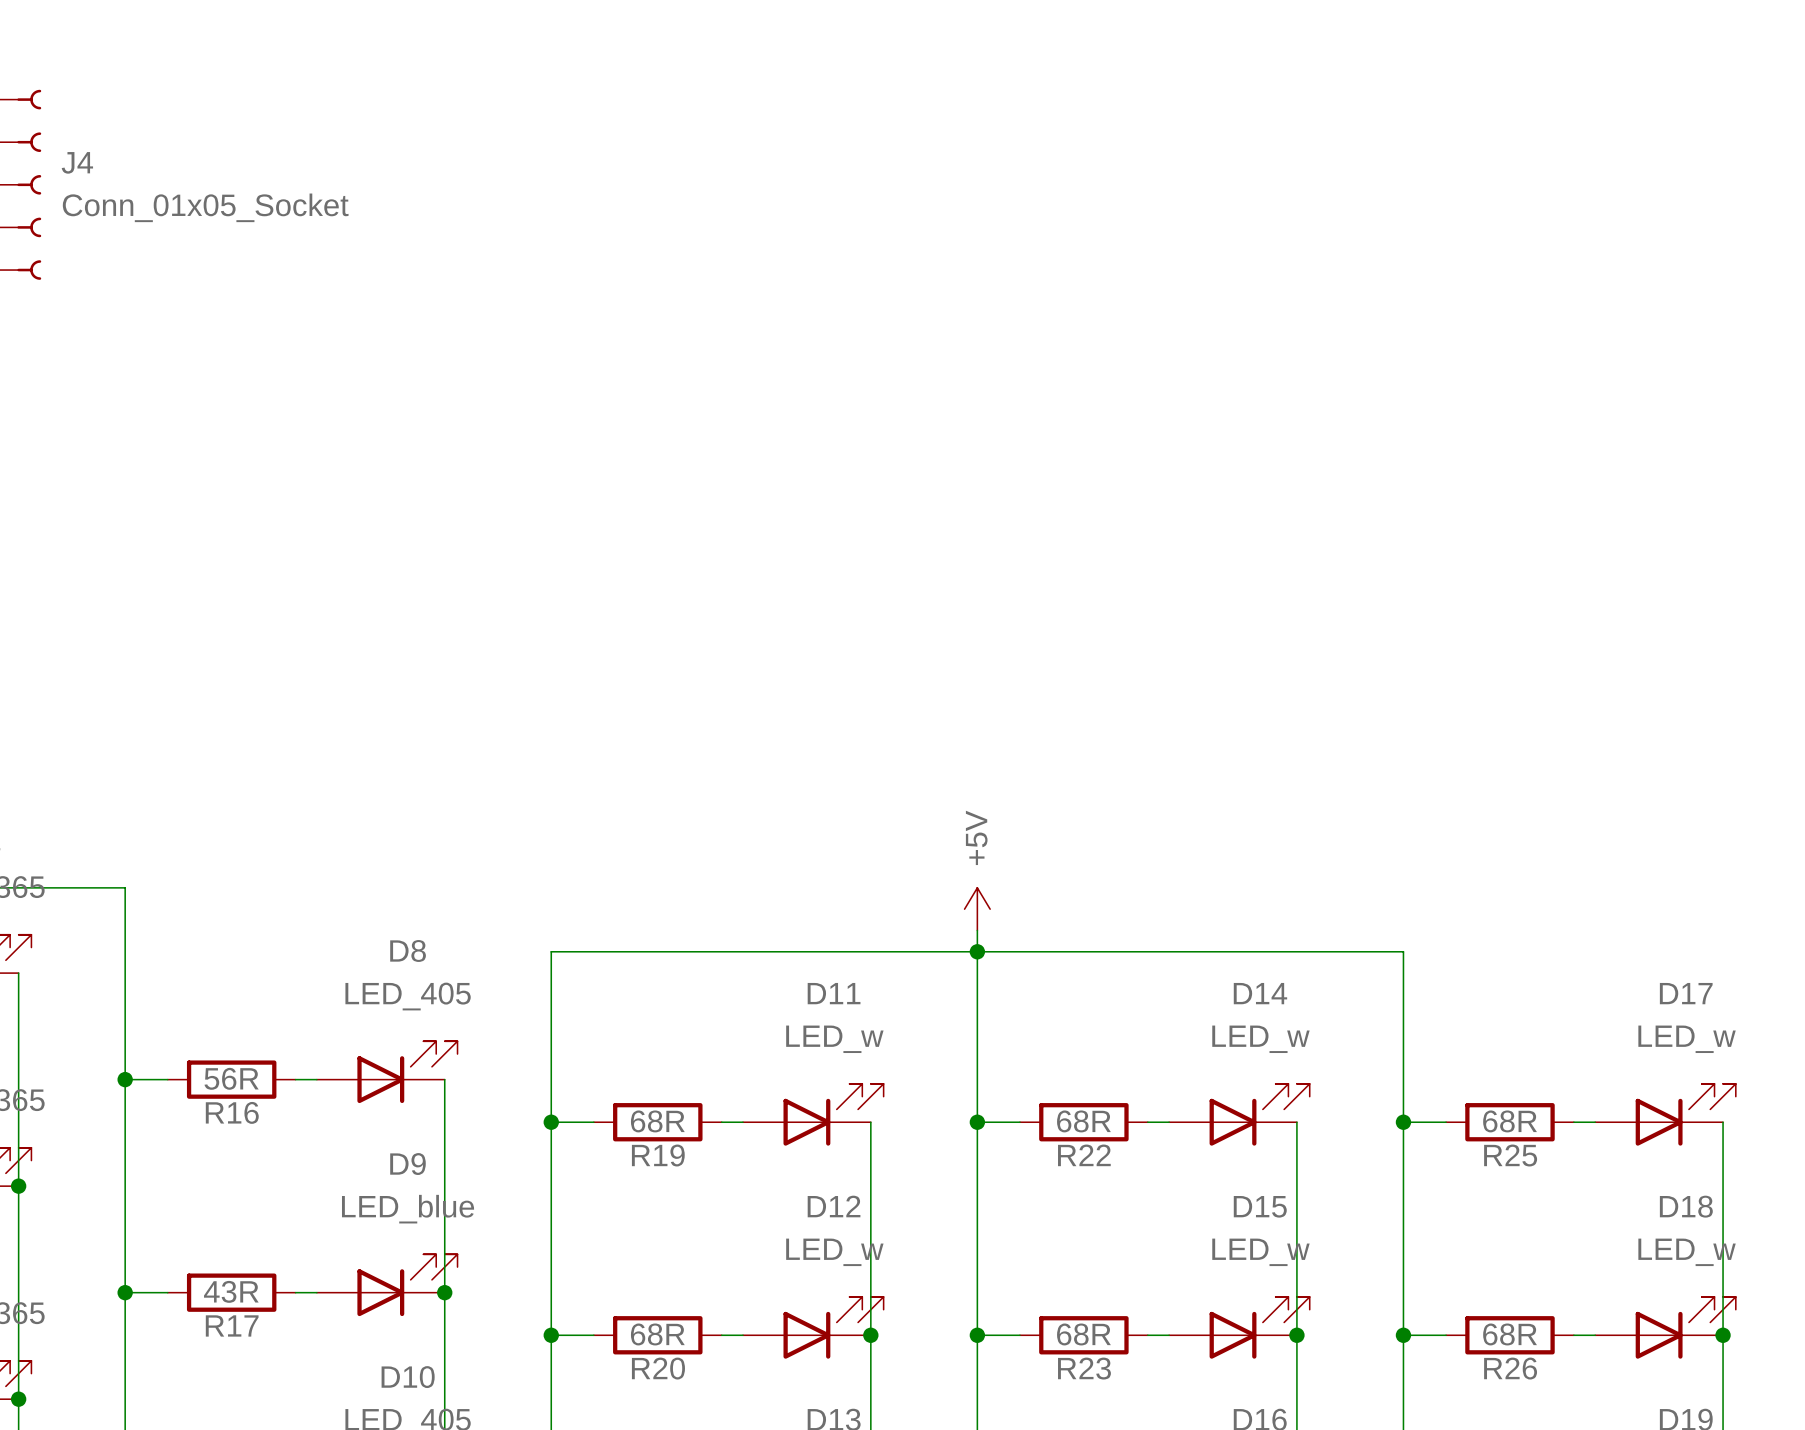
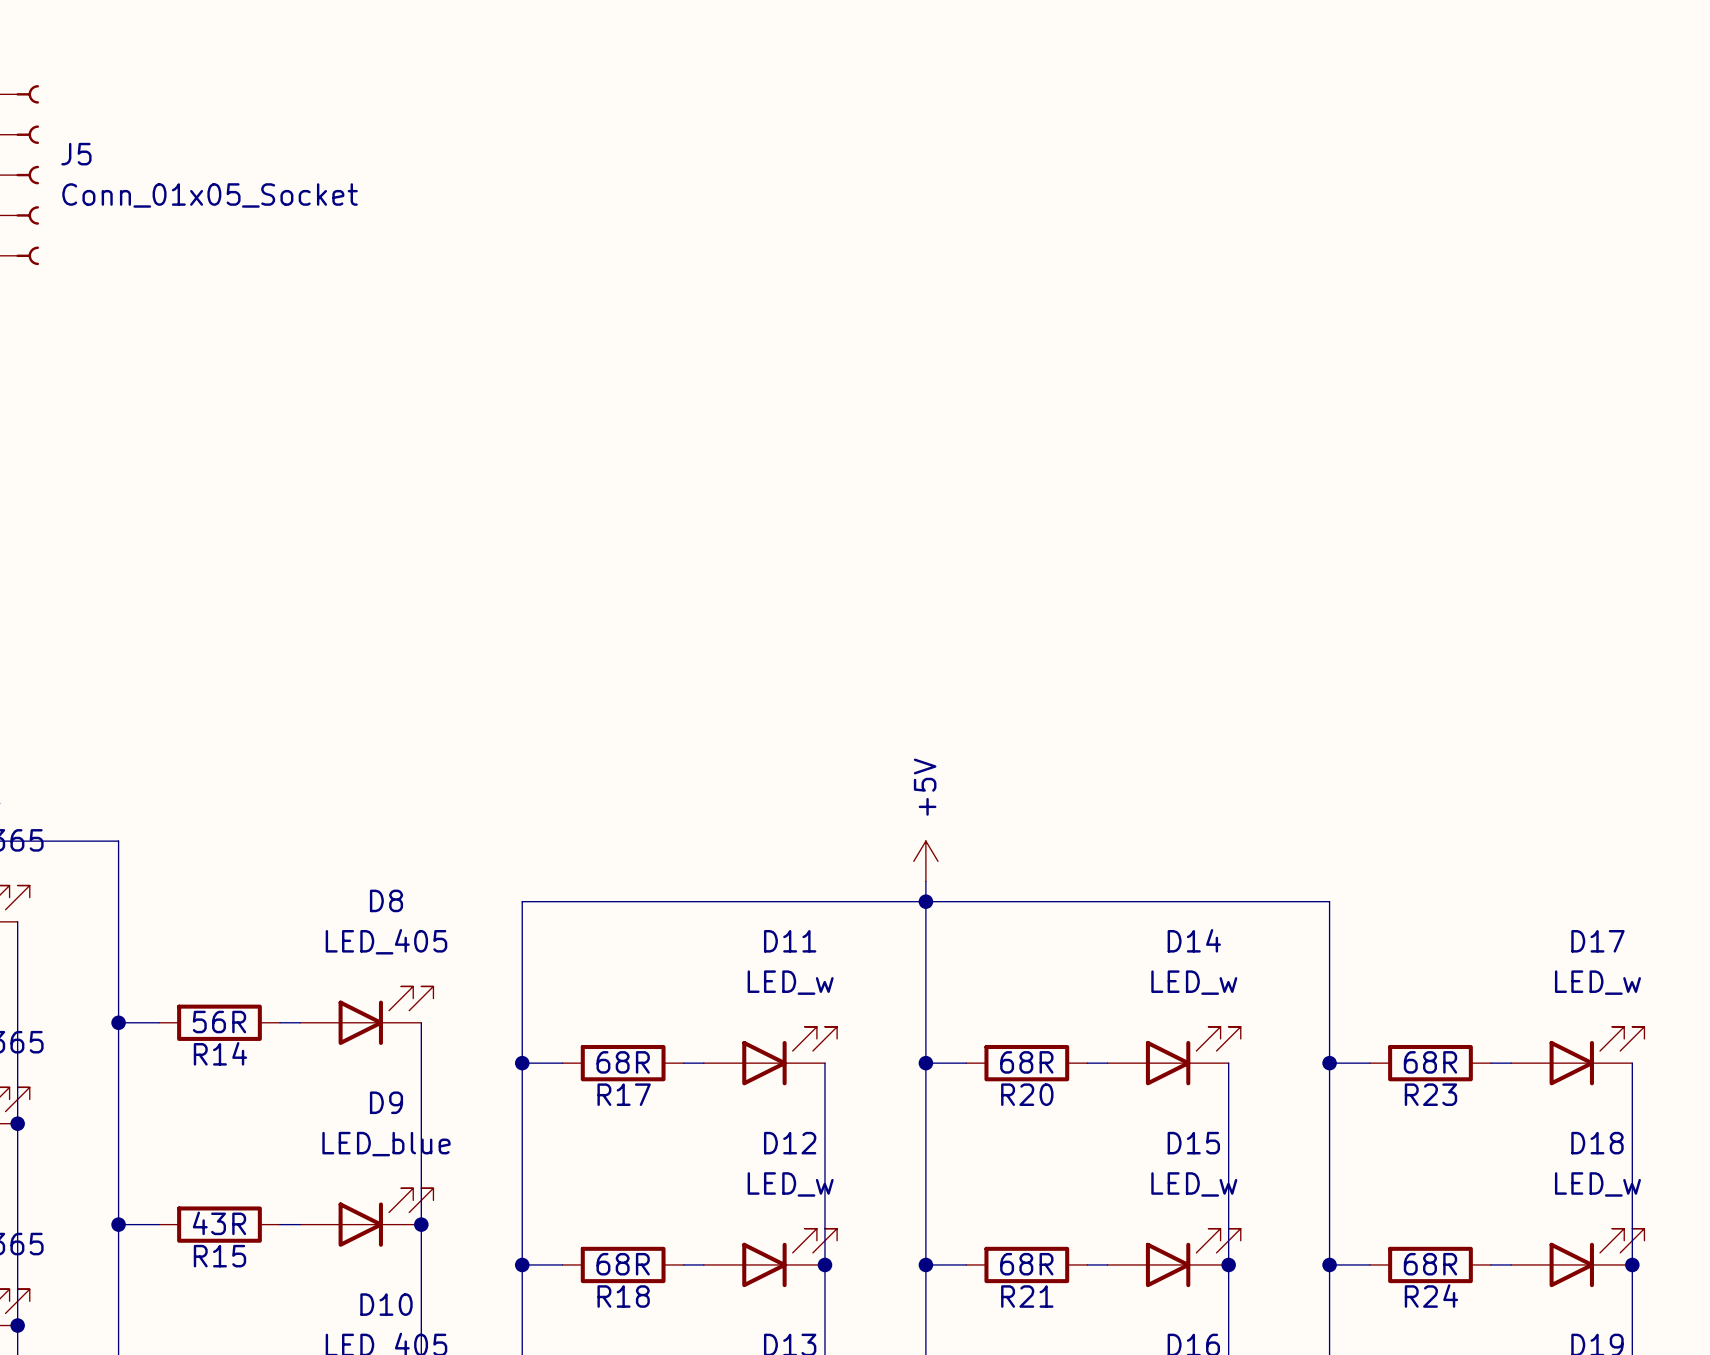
J4 name: J4 (77, 162) -> J5 (76, 154)
R16 name: R16 (232, 1112) -> R14 (220, 1053)
R19 name: R19 (658, 1155) -> R17 (624, 1094)
R22 name: R22 (1084, 1155) -> R20 (1027, 1094)
R25 name: R25 (1510, 1155) -> R23 (1430, 1094)
R17 name: R17 (232, 1325) -> R15 (219, 1256)
R20 name: R20 (658, 1368) -> R18 (623, 1296)
R23 name: R23 (1084, 1368) -> R21 (1027, 1296)
R26 name: R26 (1510, 1368) -> R24 (1431, 1296)

